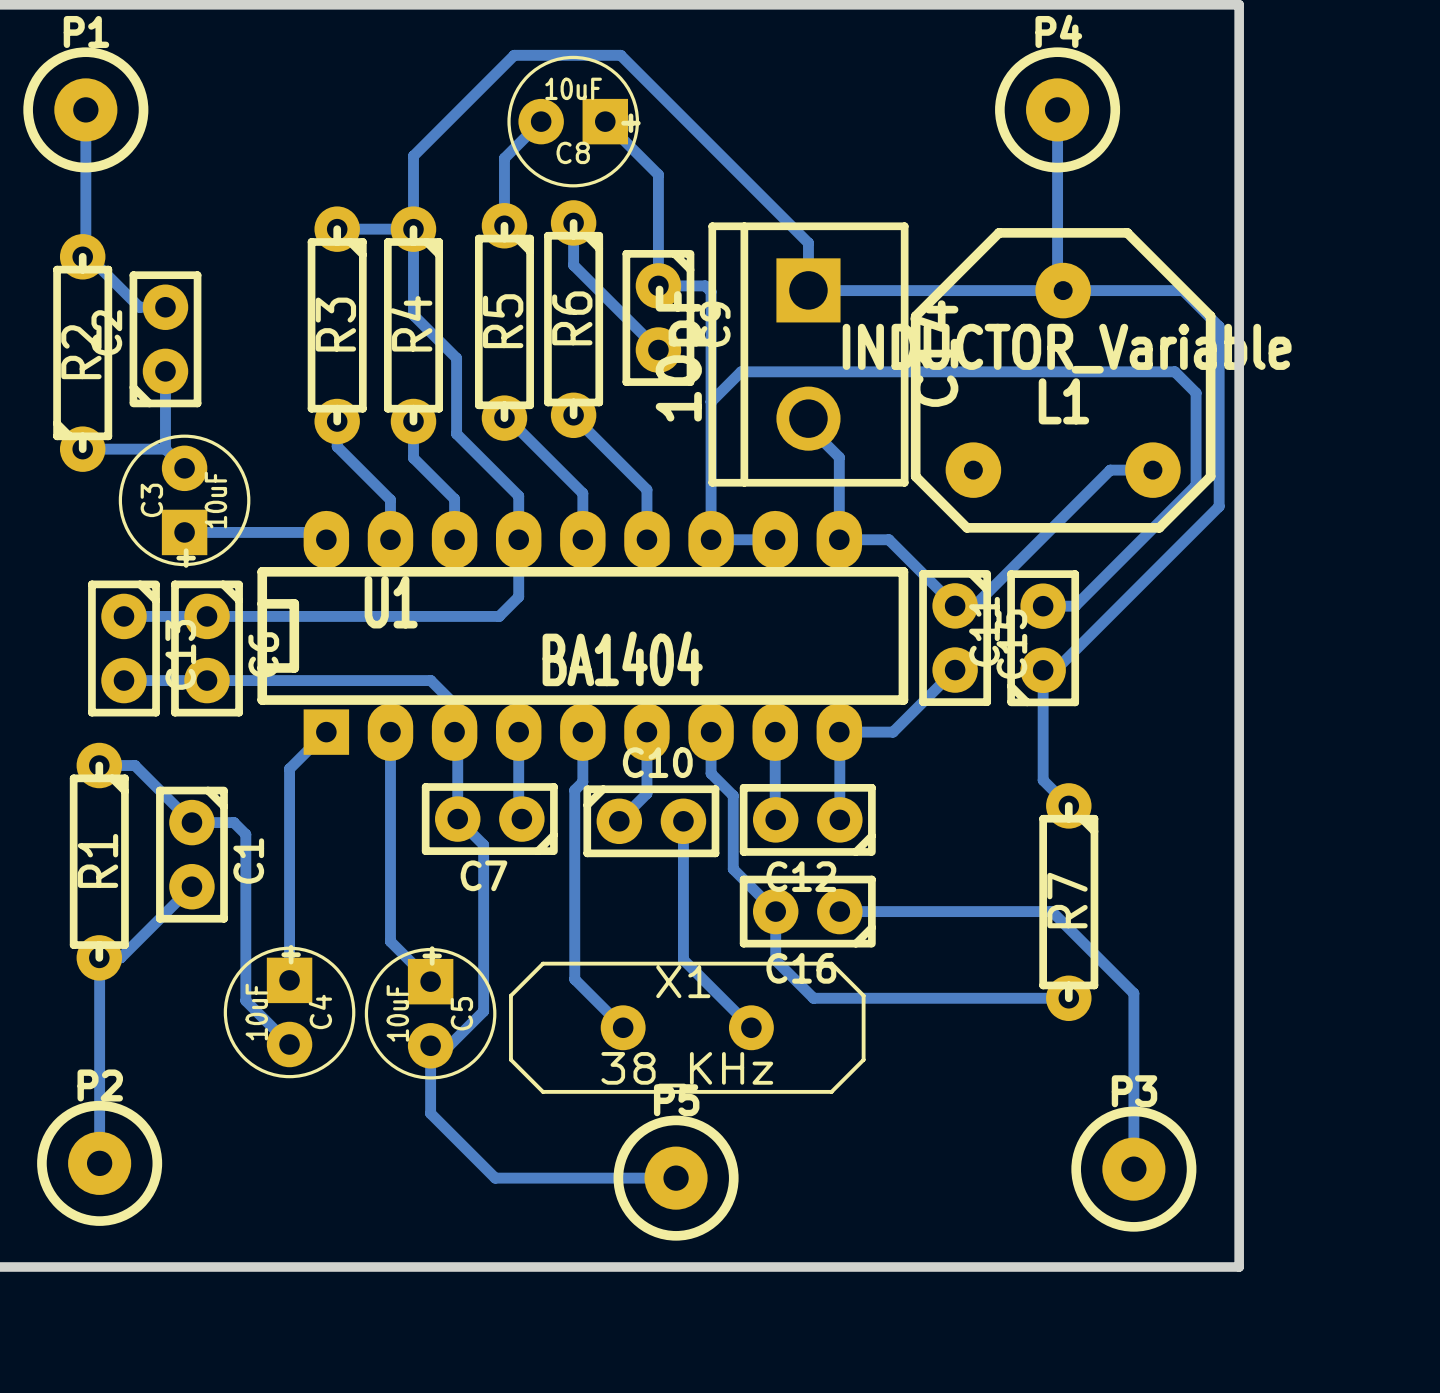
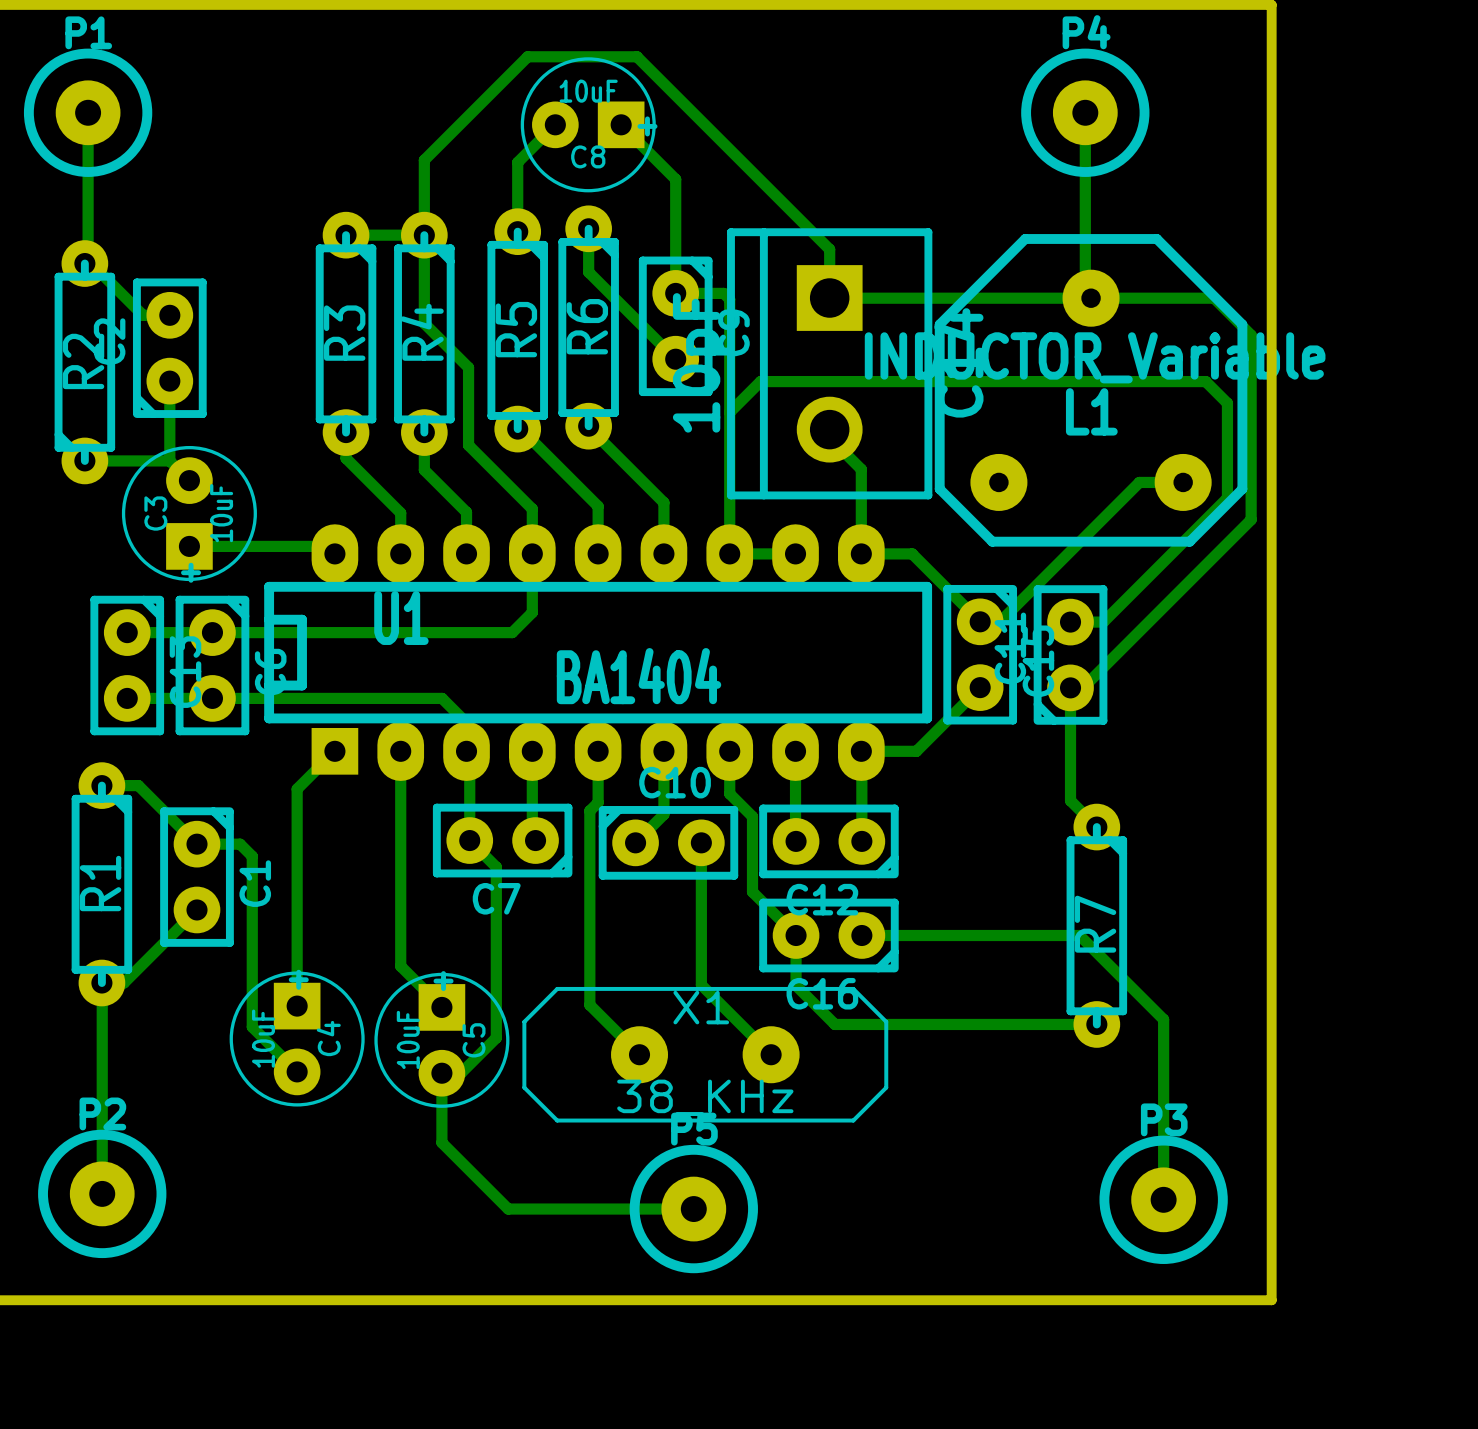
X1 footprint: [509, 961, 866, 1094] -> [522, 986, 889, 1123]

